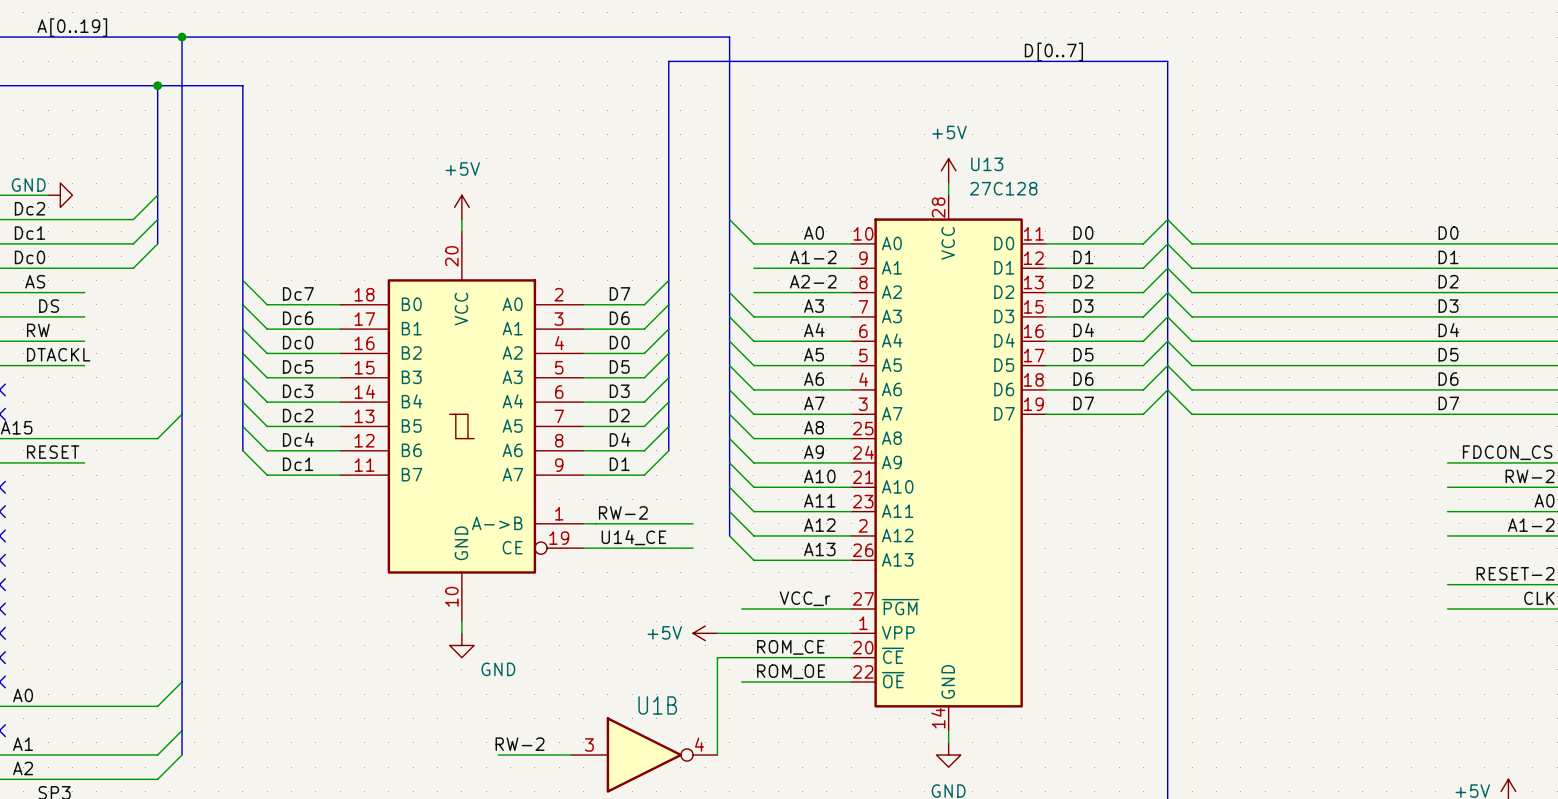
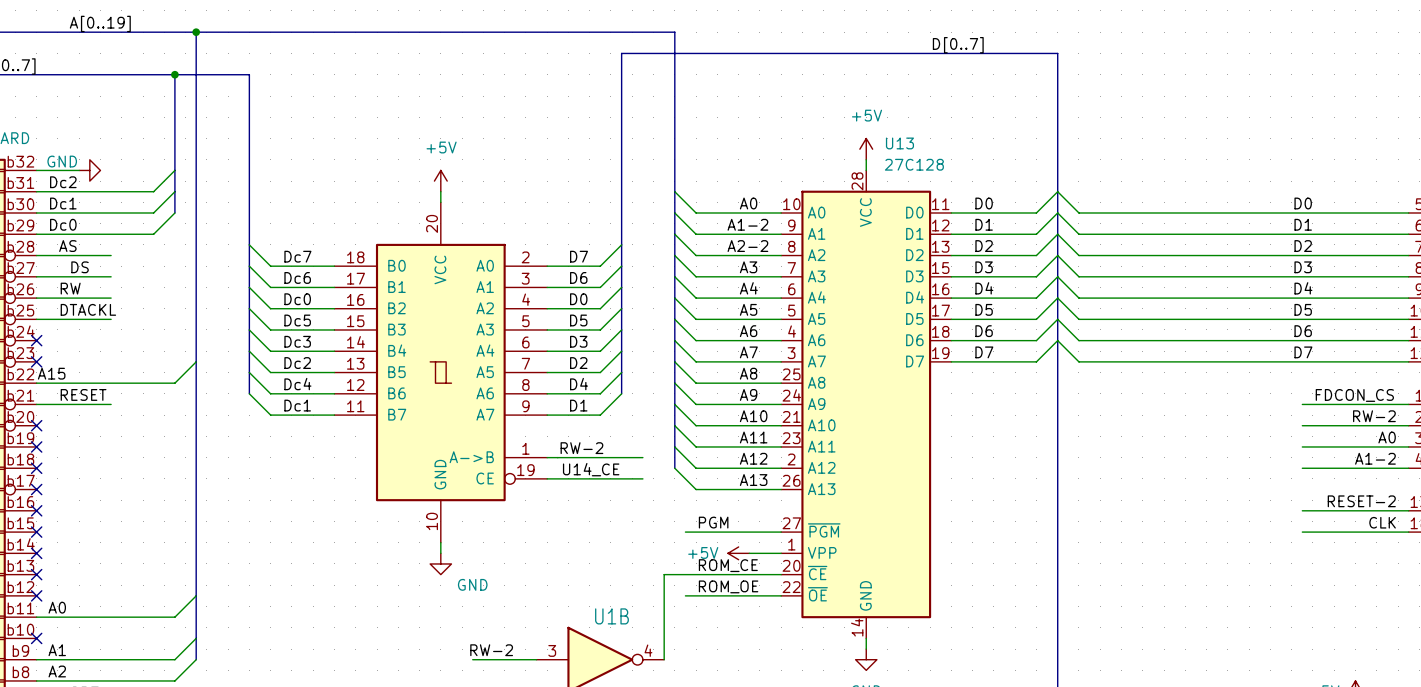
wire: none -> (674, 212) (696, 234)
wire: none -> (674, 234) (696, 255)
label: none -> PGM (713, 522)
label: VCC_r (805, 598) -> none
power symbol position: +5V (705, 633) -> +5V (738, 553)
wire: (717, 633) (814, 633) -> none

